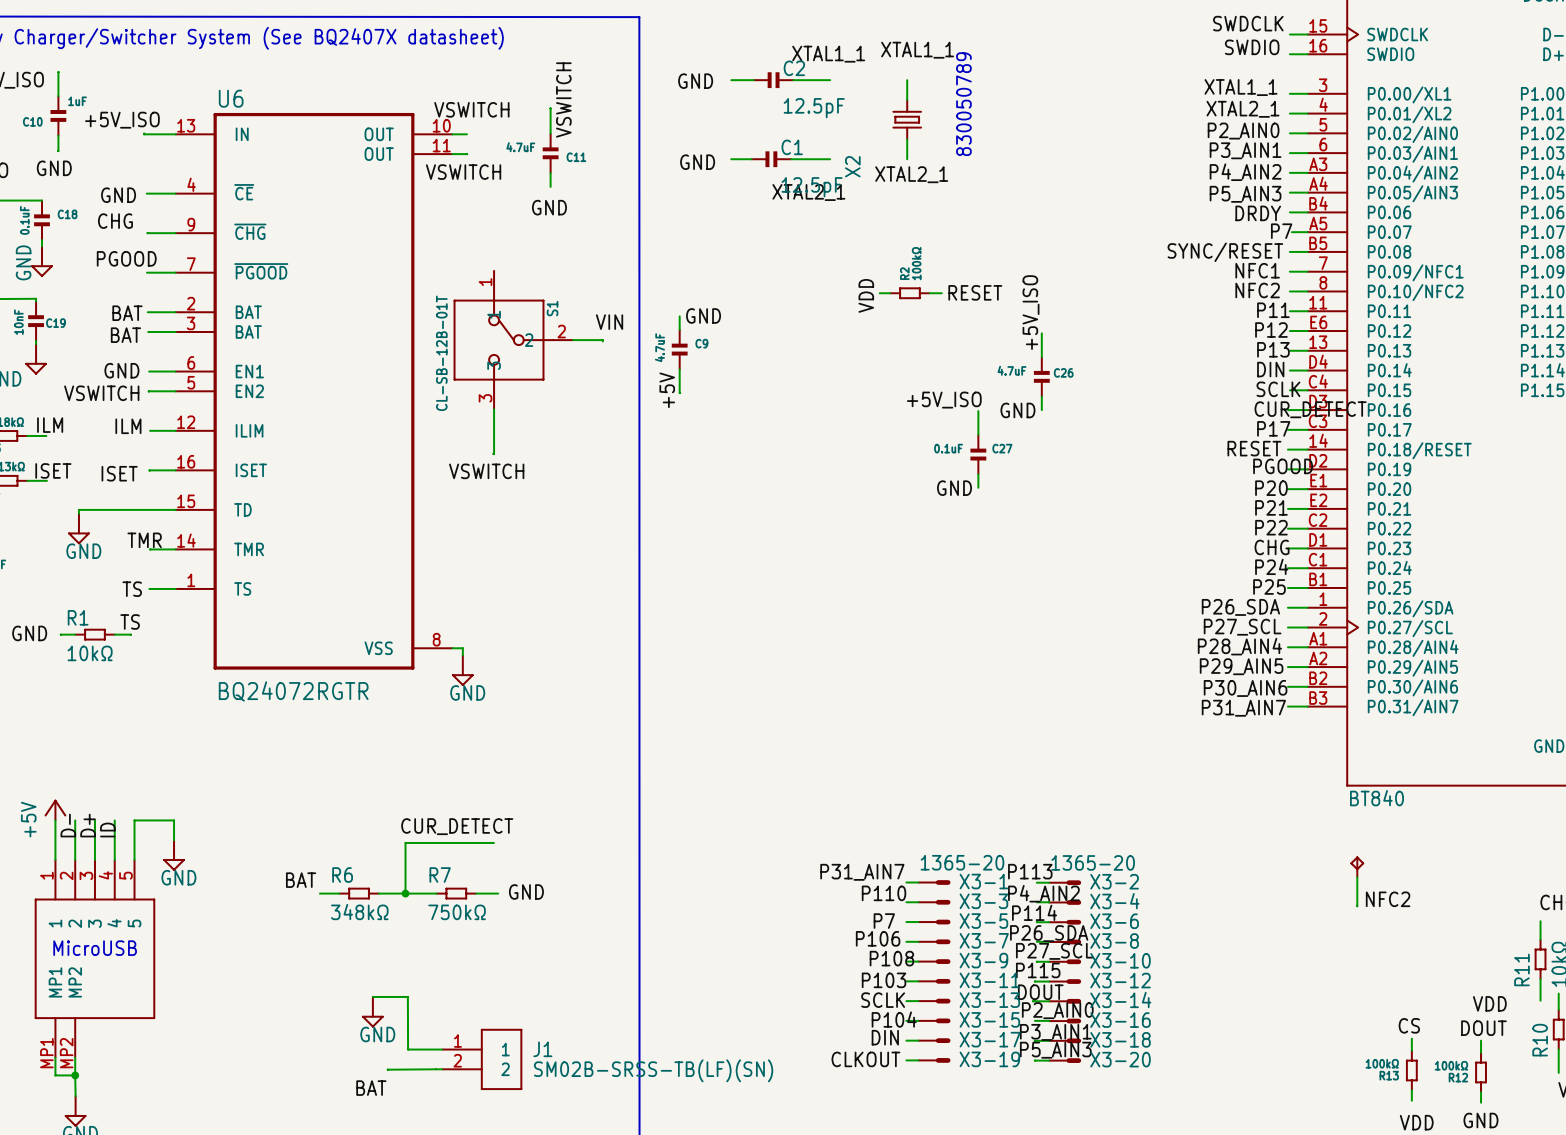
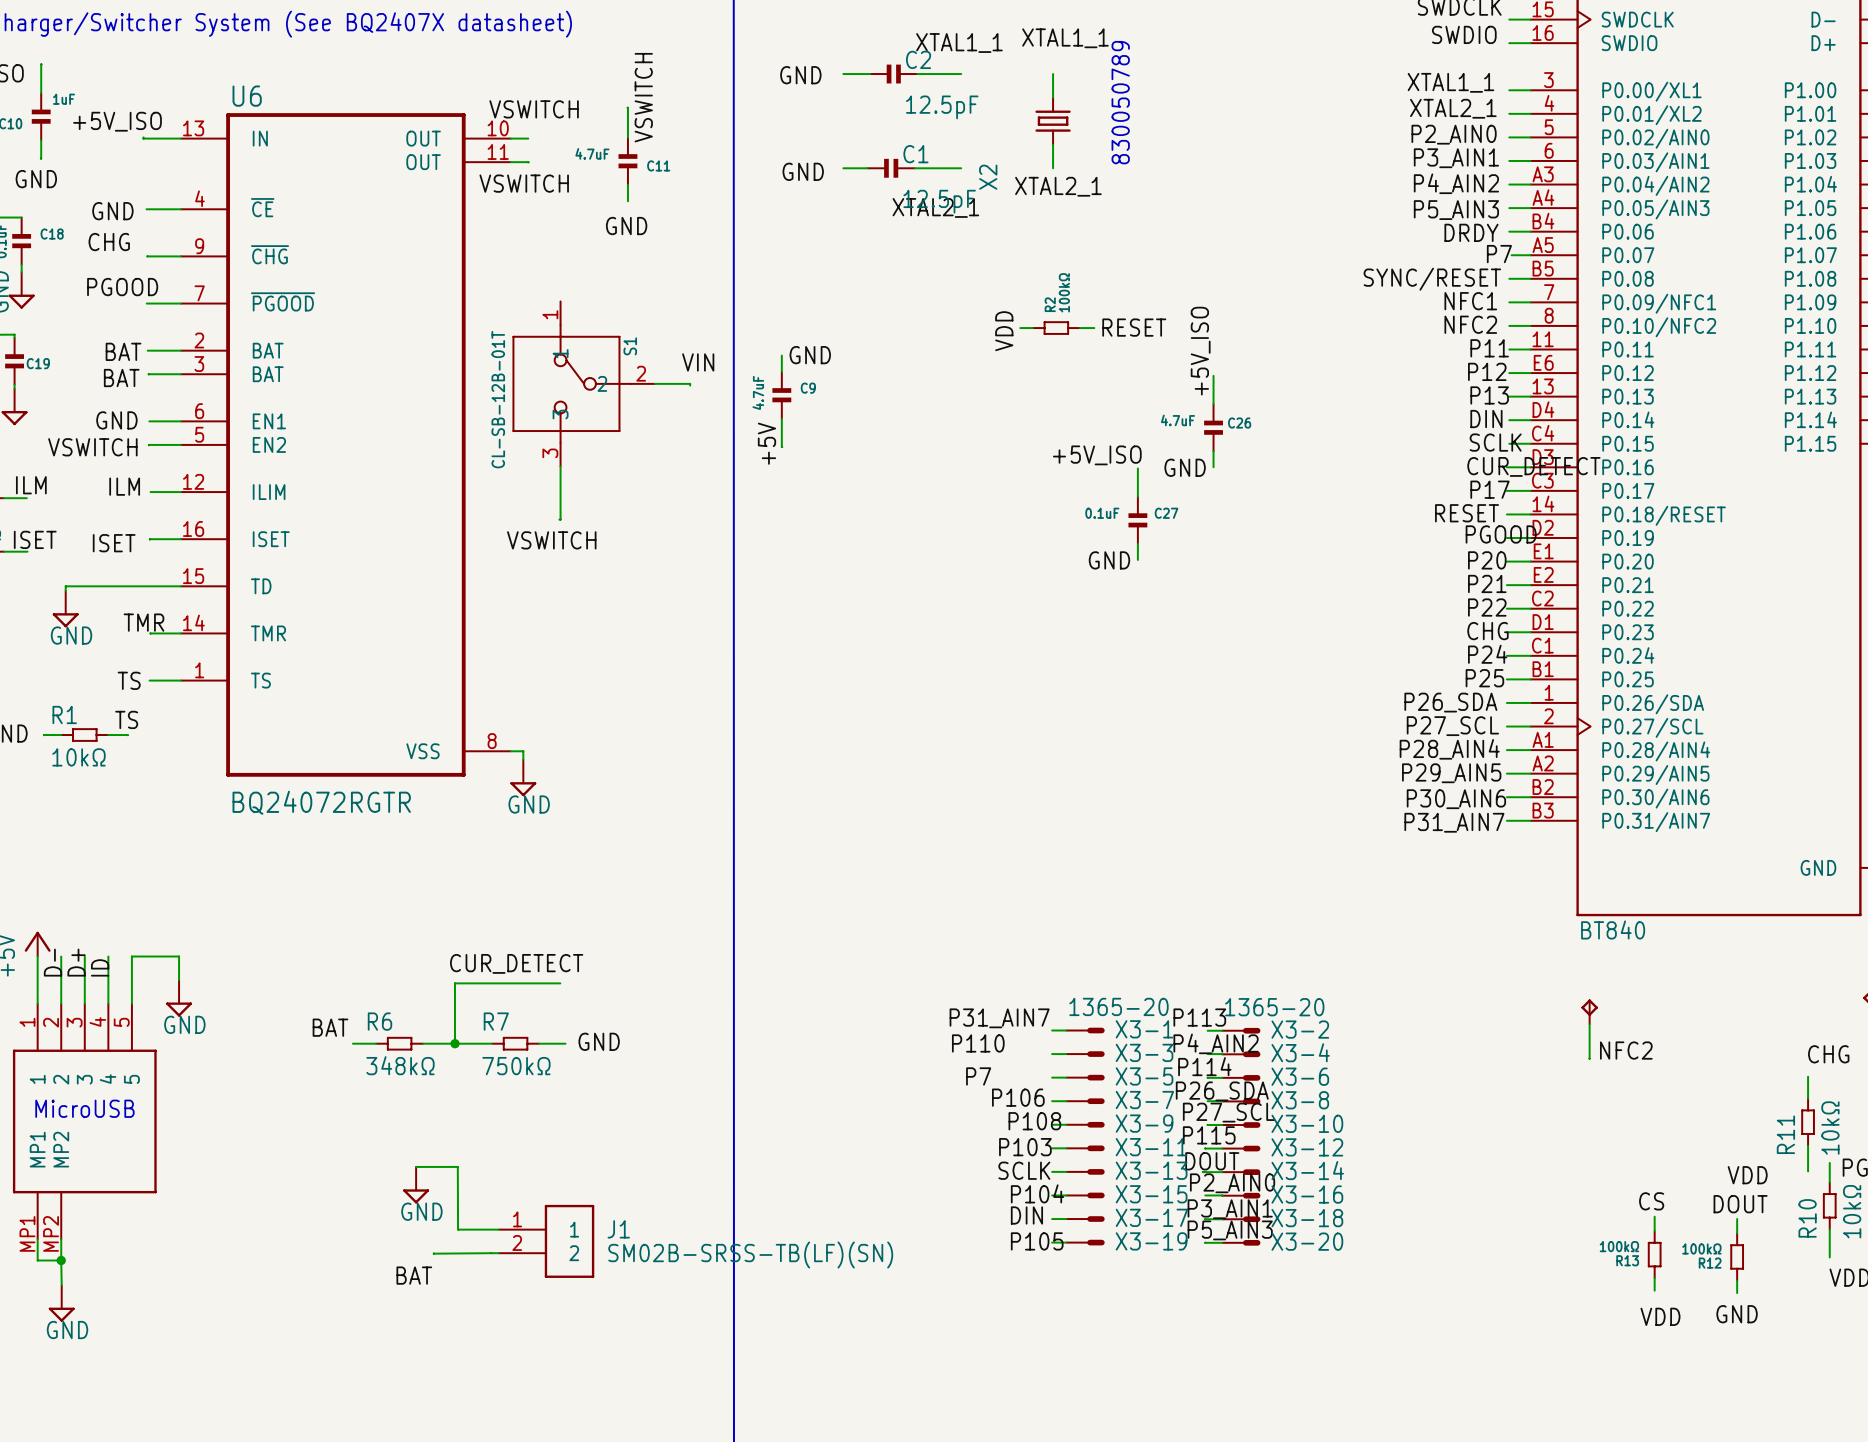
label position: P110 (884, 893) -> P110 (978, 1043)
label position: P7 (884, 921) -> P7 (978, 1076)
label: CLKOUT (865, 1059) -> none
label: none -> P105 (1037, 1241)

